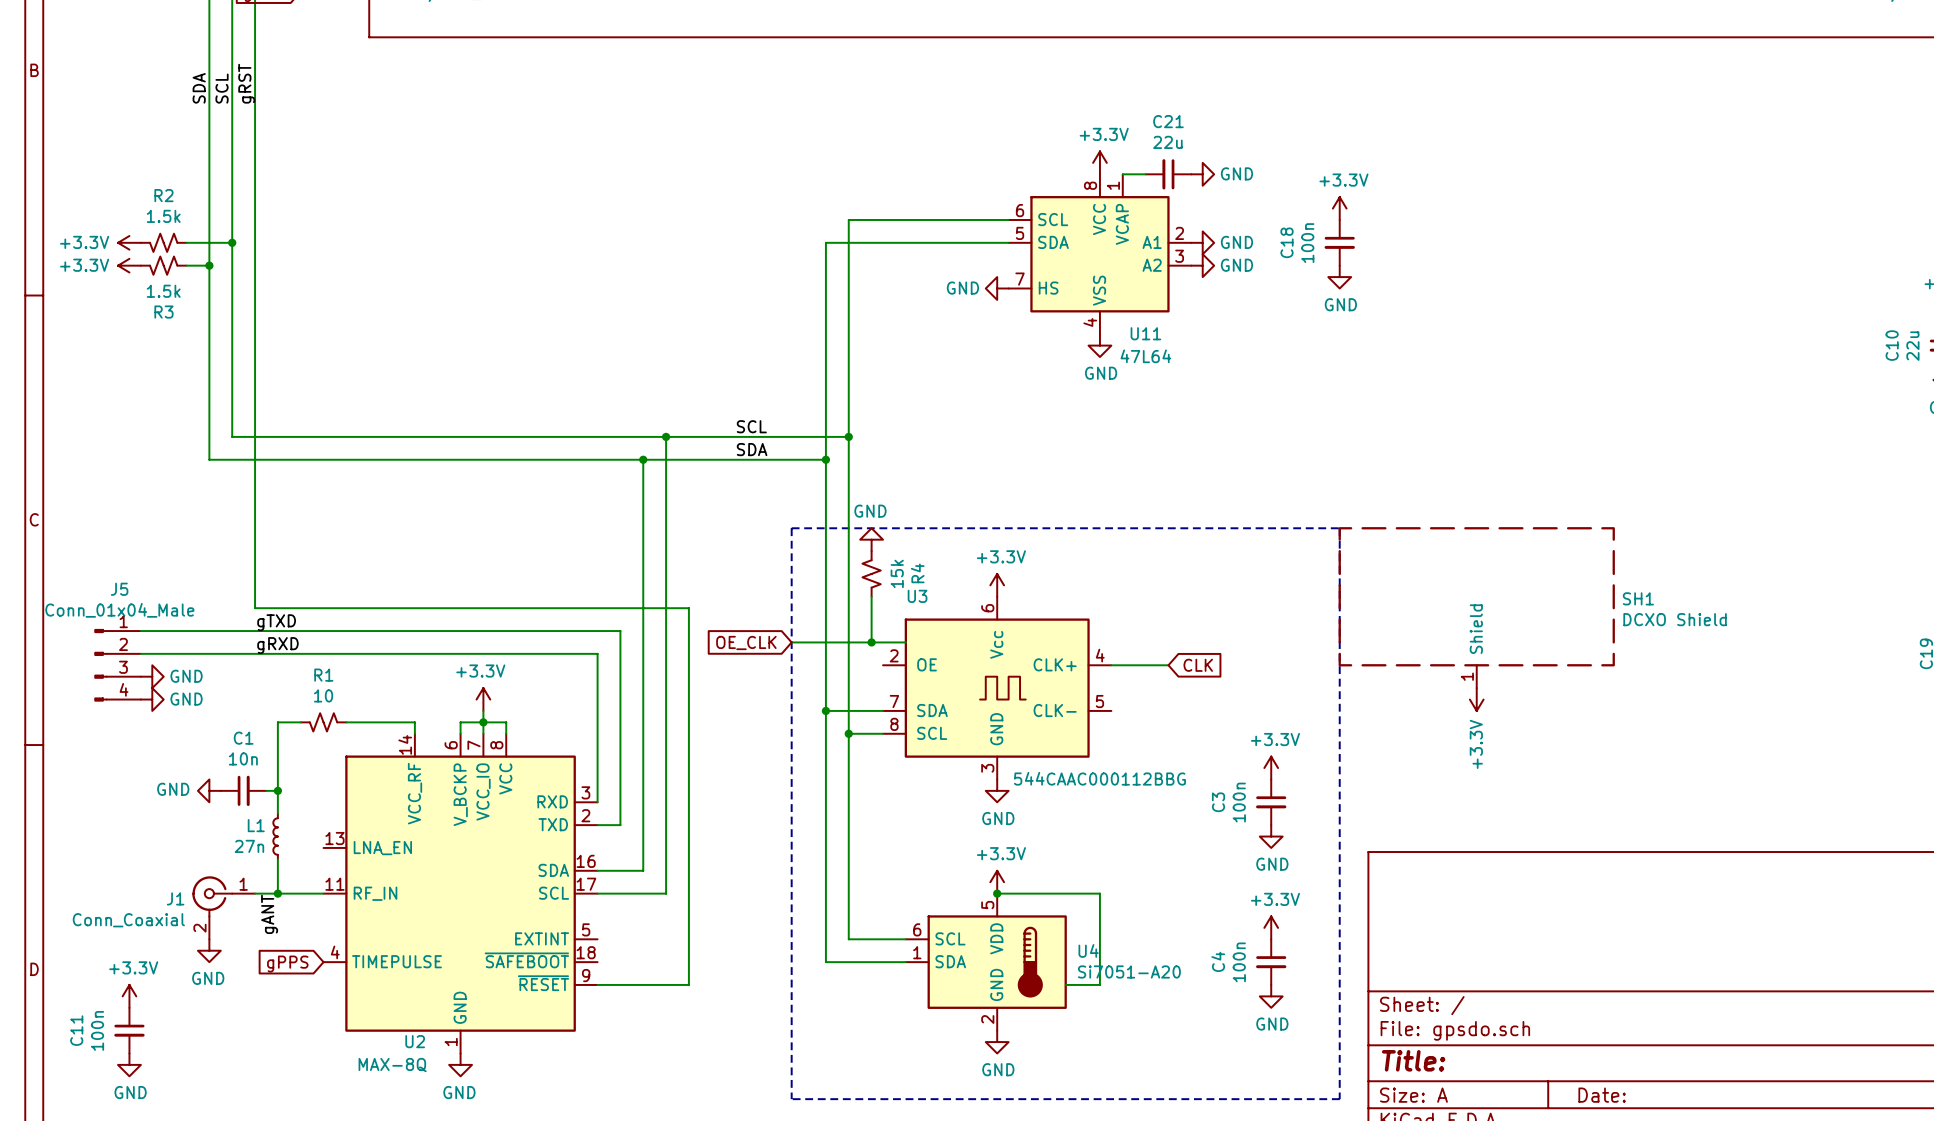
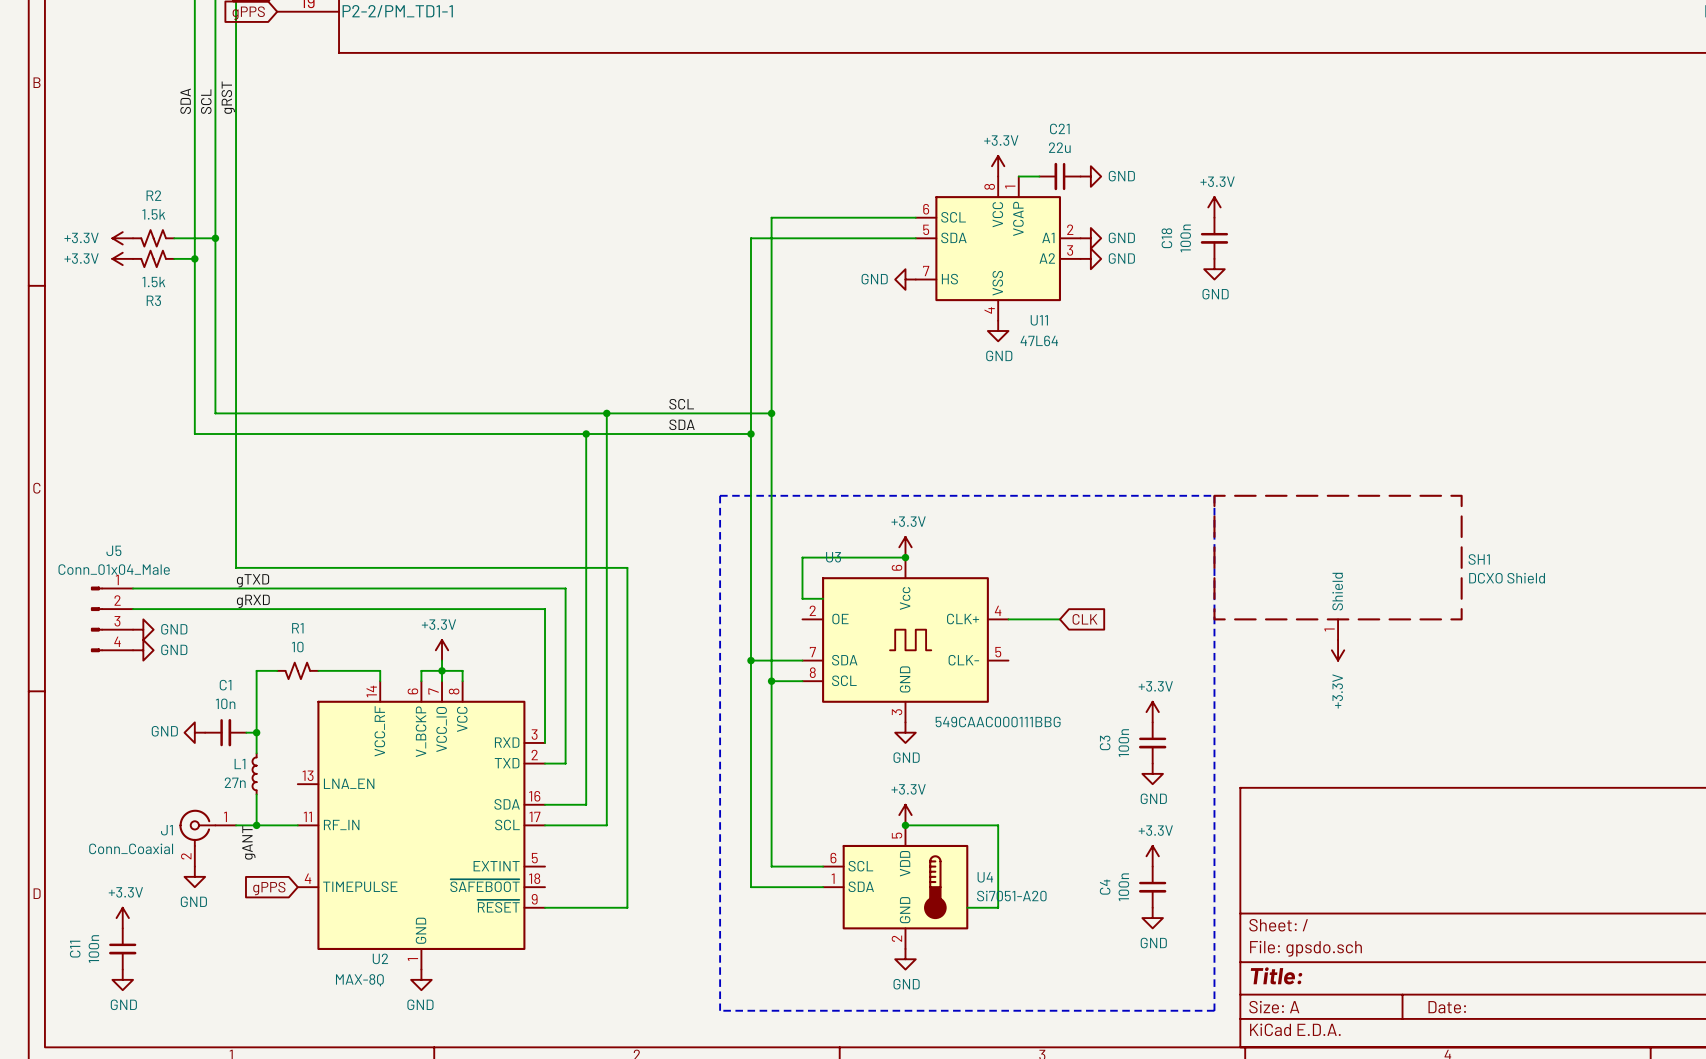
power symbol: GND (871, 539) -> none
R4: 15k (871, 573) -> none
wire: (871, 596) (871, 642) -> none
junction: none -> (905, 557)
global label: OE_CLK (746, 642) -> none
wire: (791, 642) (883, 642) -> (905, 557) (802, 557) (802, 598)
junction: (871, 642) -> none
U3 value: 544CAAC000112BBG (1099, 778) -> 549CAAC000111BBG (998, 722)

